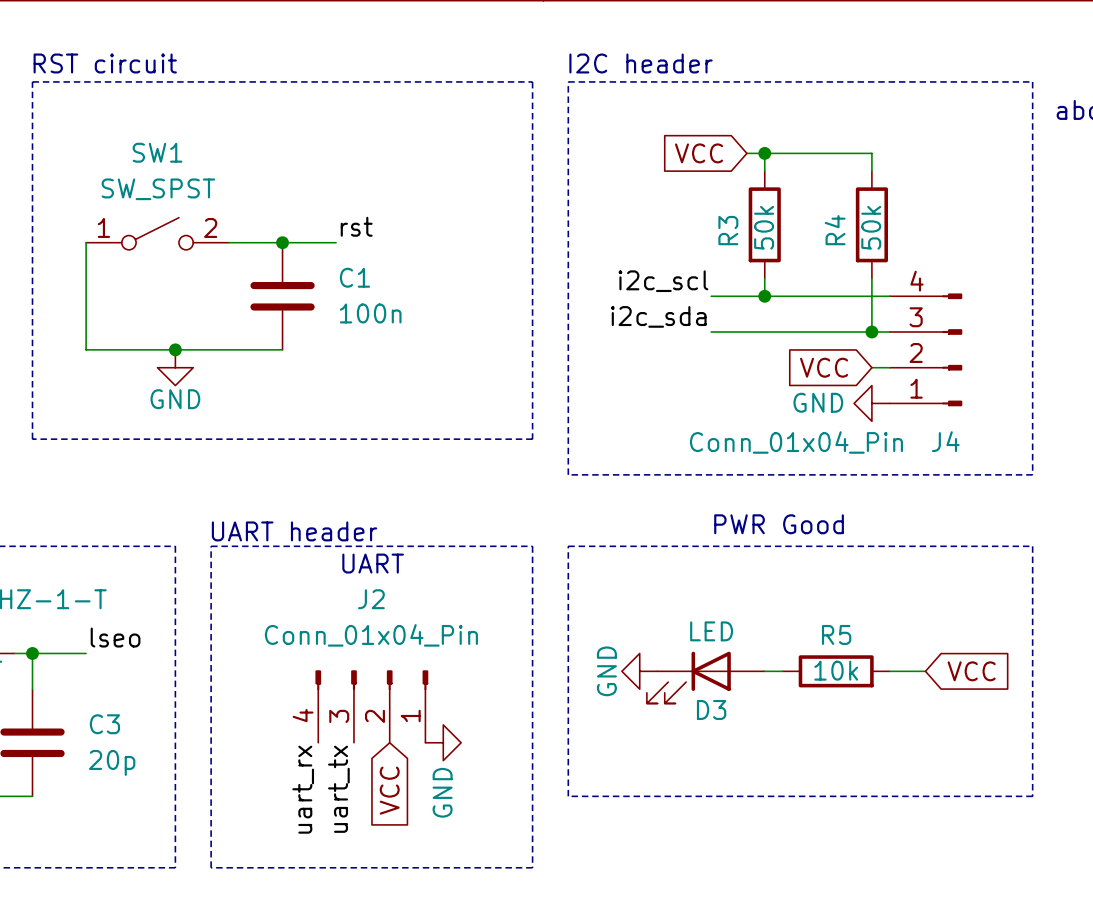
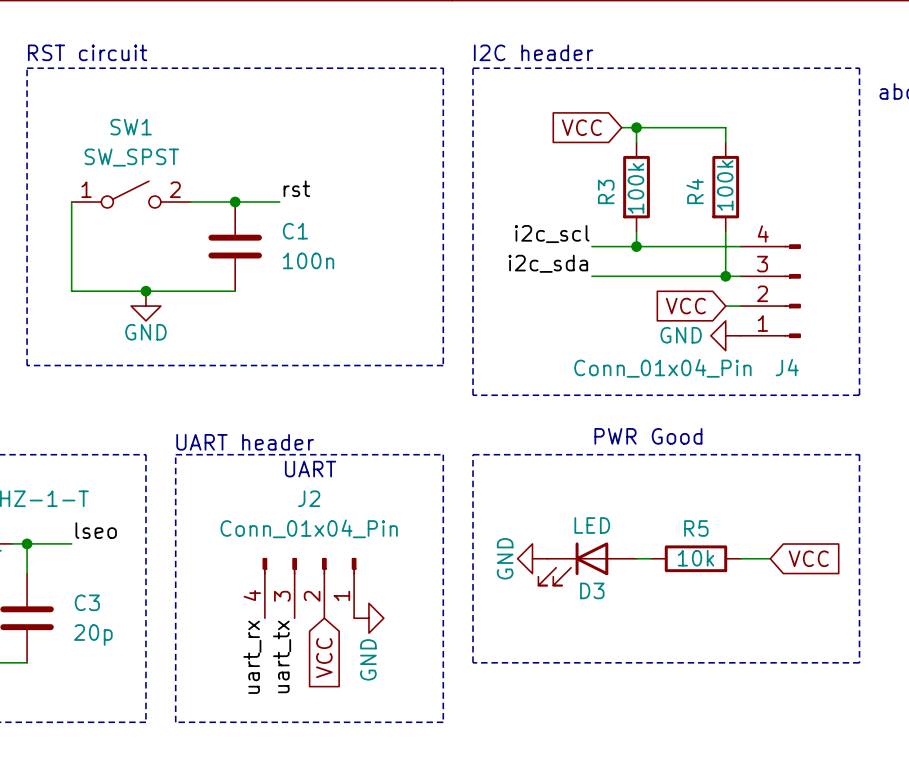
R3 value: 50k (764, 227) -> 100k (635, 188)
R4 value: 50k (871, 227) -> 100k (725, 185)

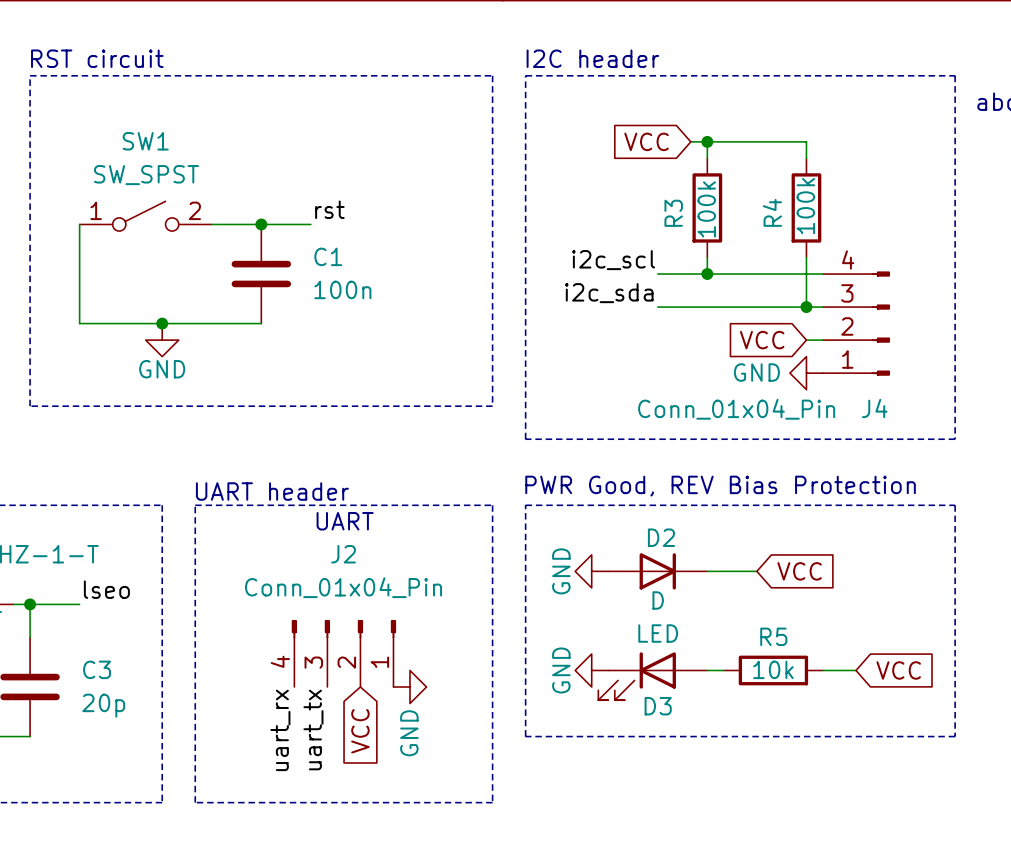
text: PWR Good (648, 436) -> PWR Good, REV Bias Protection (720, 486)
power symbol: none -> GND (591, 571)
D2: none -> D (657, 571)
wire: none -> (707, 571) (756, 571)
global label: none -> VCC (799, 571)
power symbol: GND (532, 558) -> none
wire: (636, 558) (651, 558) -> (707, 670) (723, 670)
R5 position: (695, 558) -> (773, 670)
wire: (740, 558) (770, 558) -> (822, 670) (856, 670)
global label position: VCC (808, 558) -> VCC (898, 670)
D3 position: (587, 563) -> (652, 676)
power symbol: none -> GND (591, 670)

